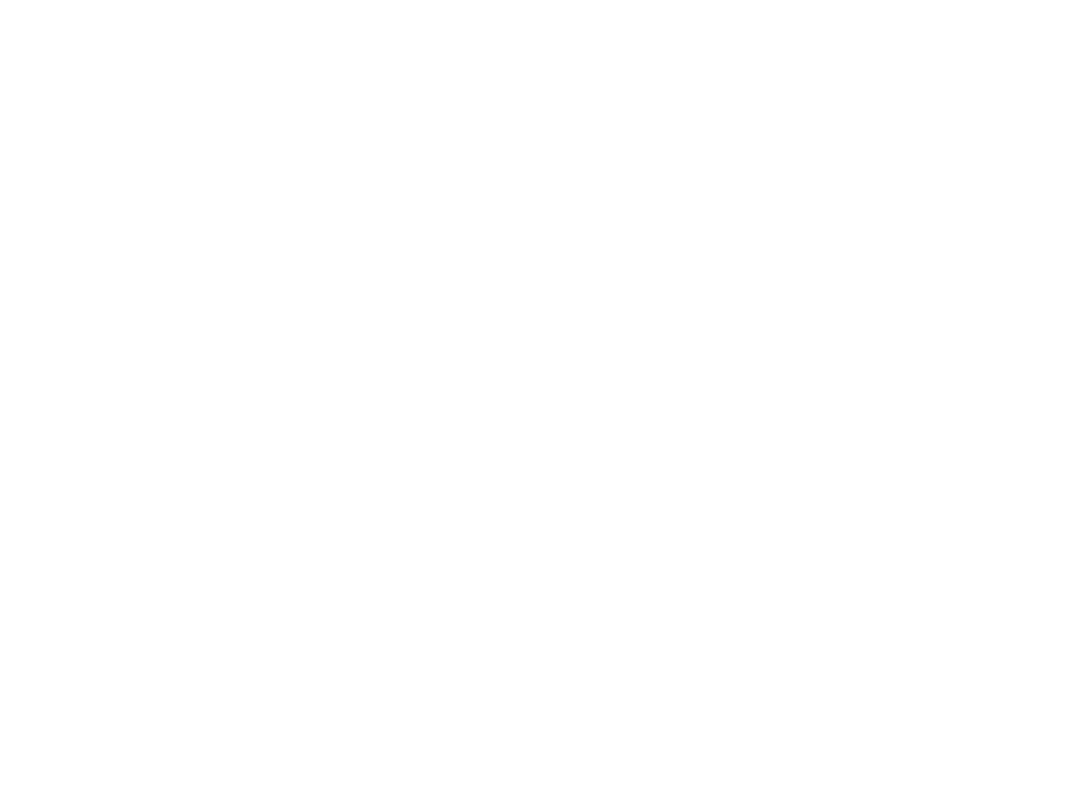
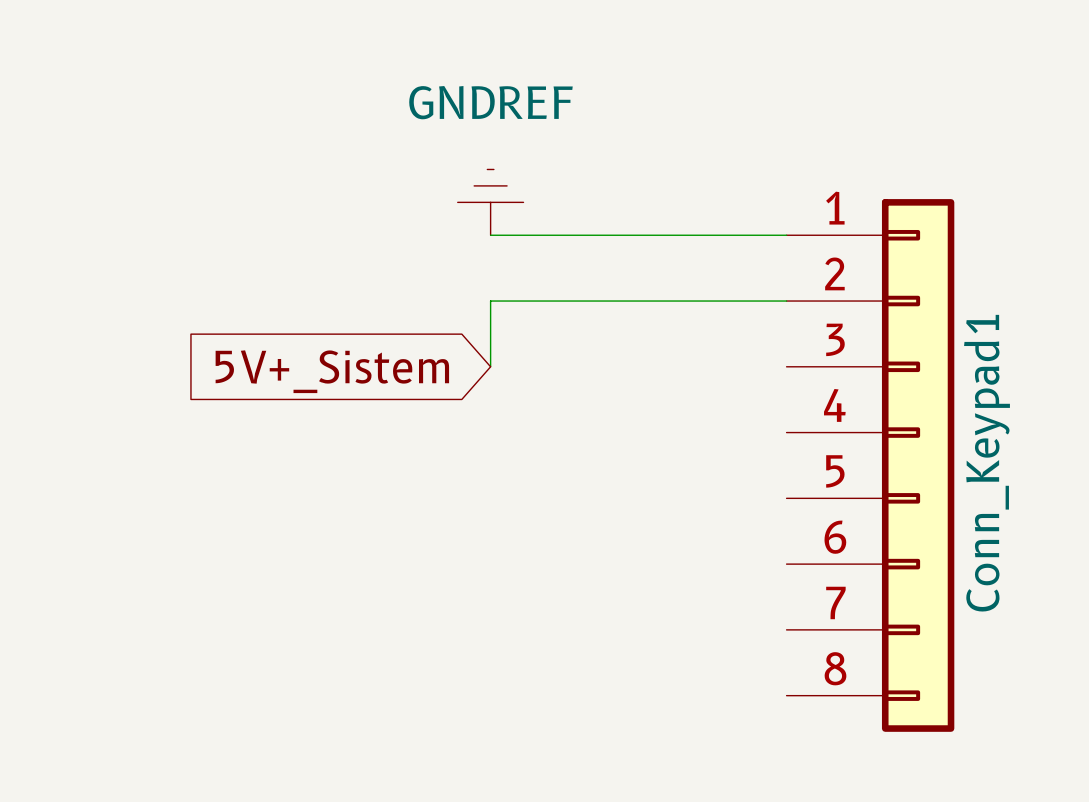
power symbol: none -> GNDREF (490, 202)
wire: none -> (490, 235) (786, 235)
wire: none -> (786, 301) (490, 301) (490, 366)
global label: none -> 5V+_Sistem (332, 371)
Conn_Keypad1: none -> (870, 465)

